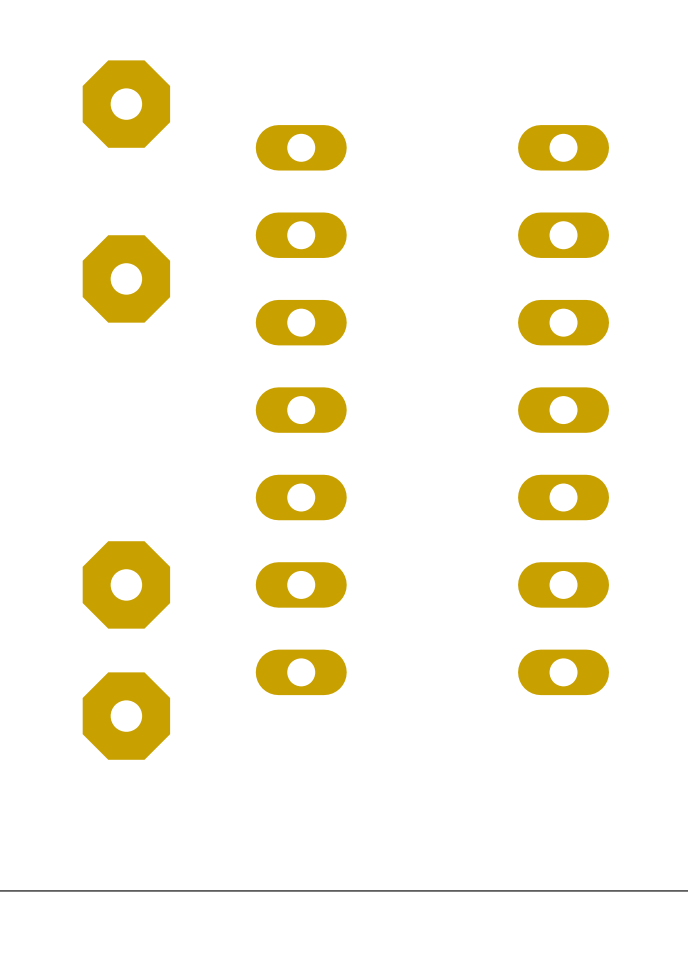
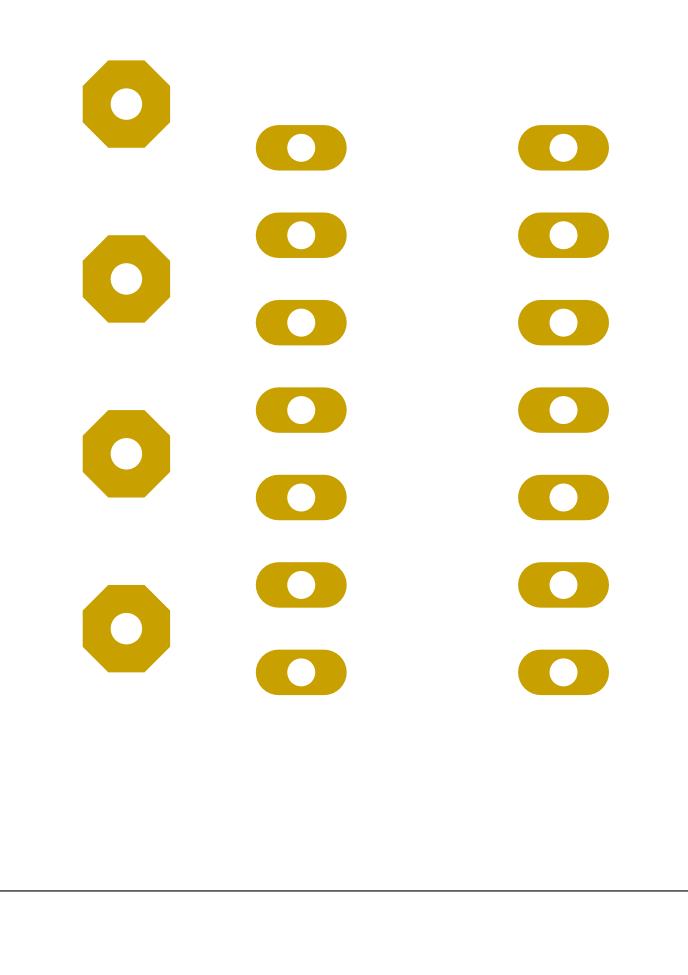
part: none -> (126, 453)
part: (126, 584) -> none
part: none -> (126, 628)
part: (126, 716) -> none

